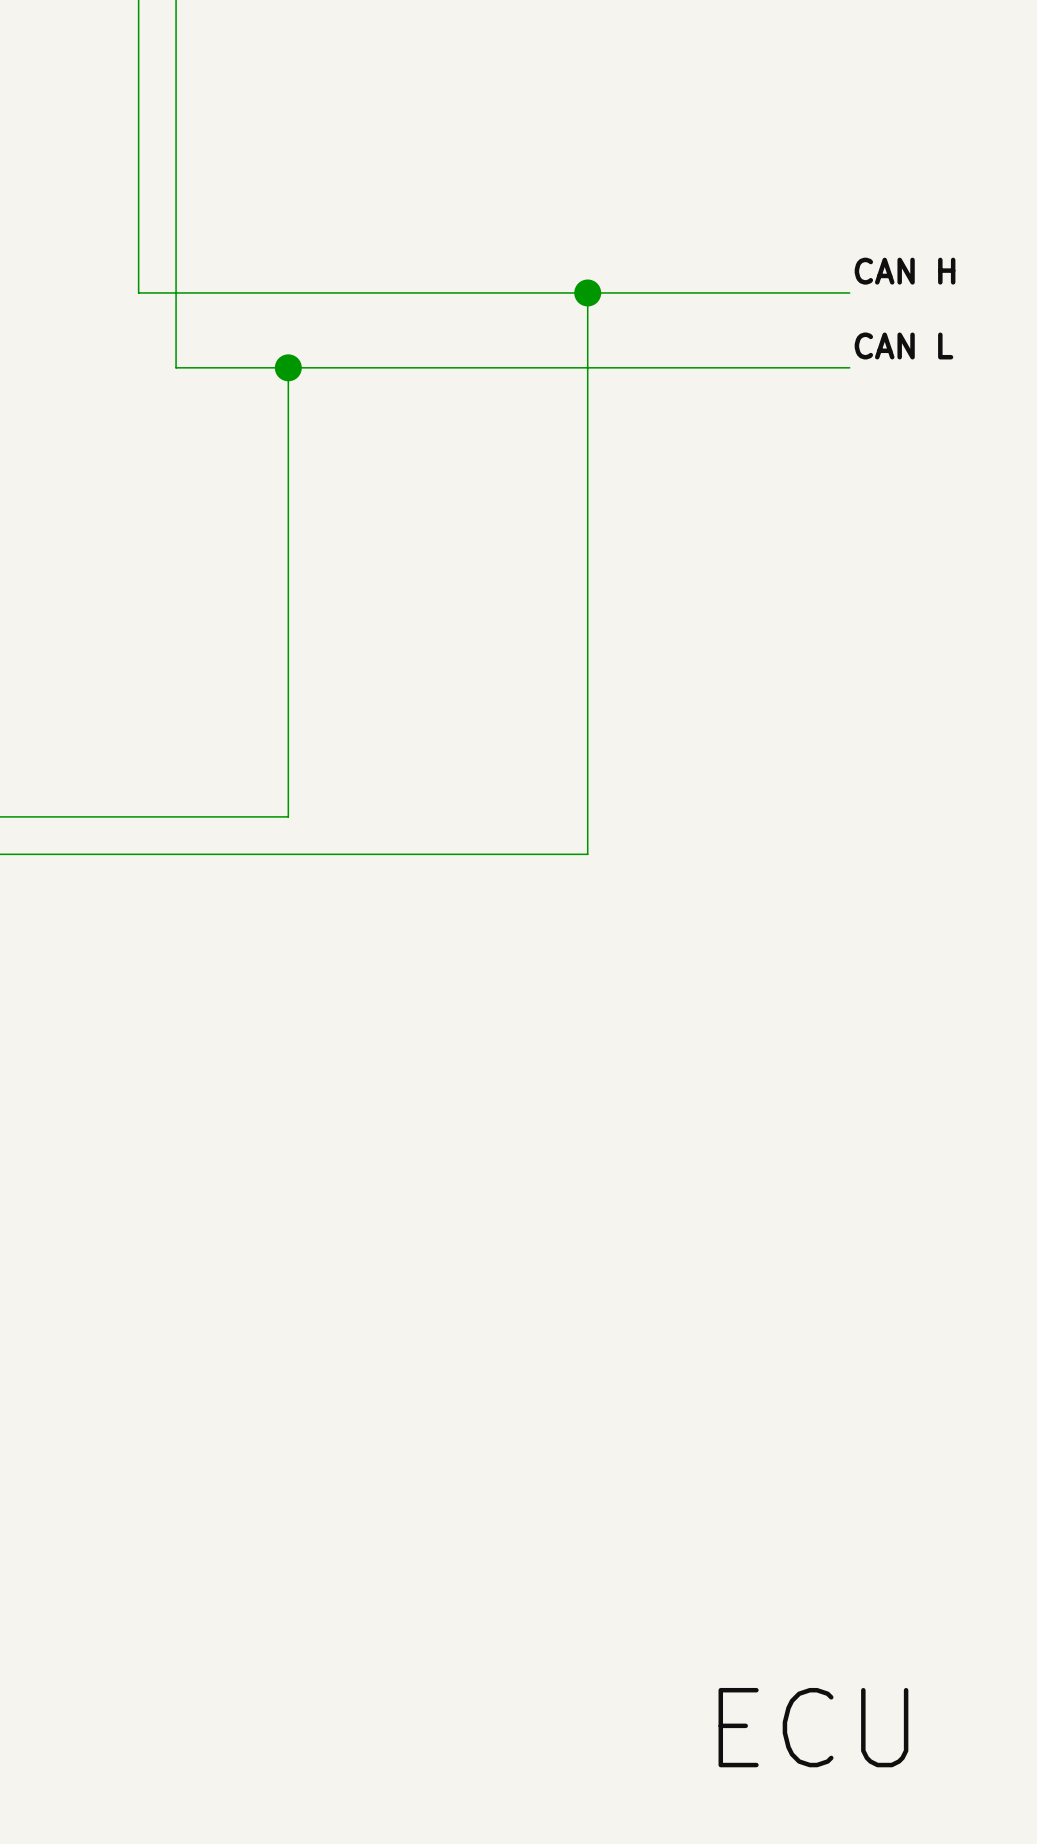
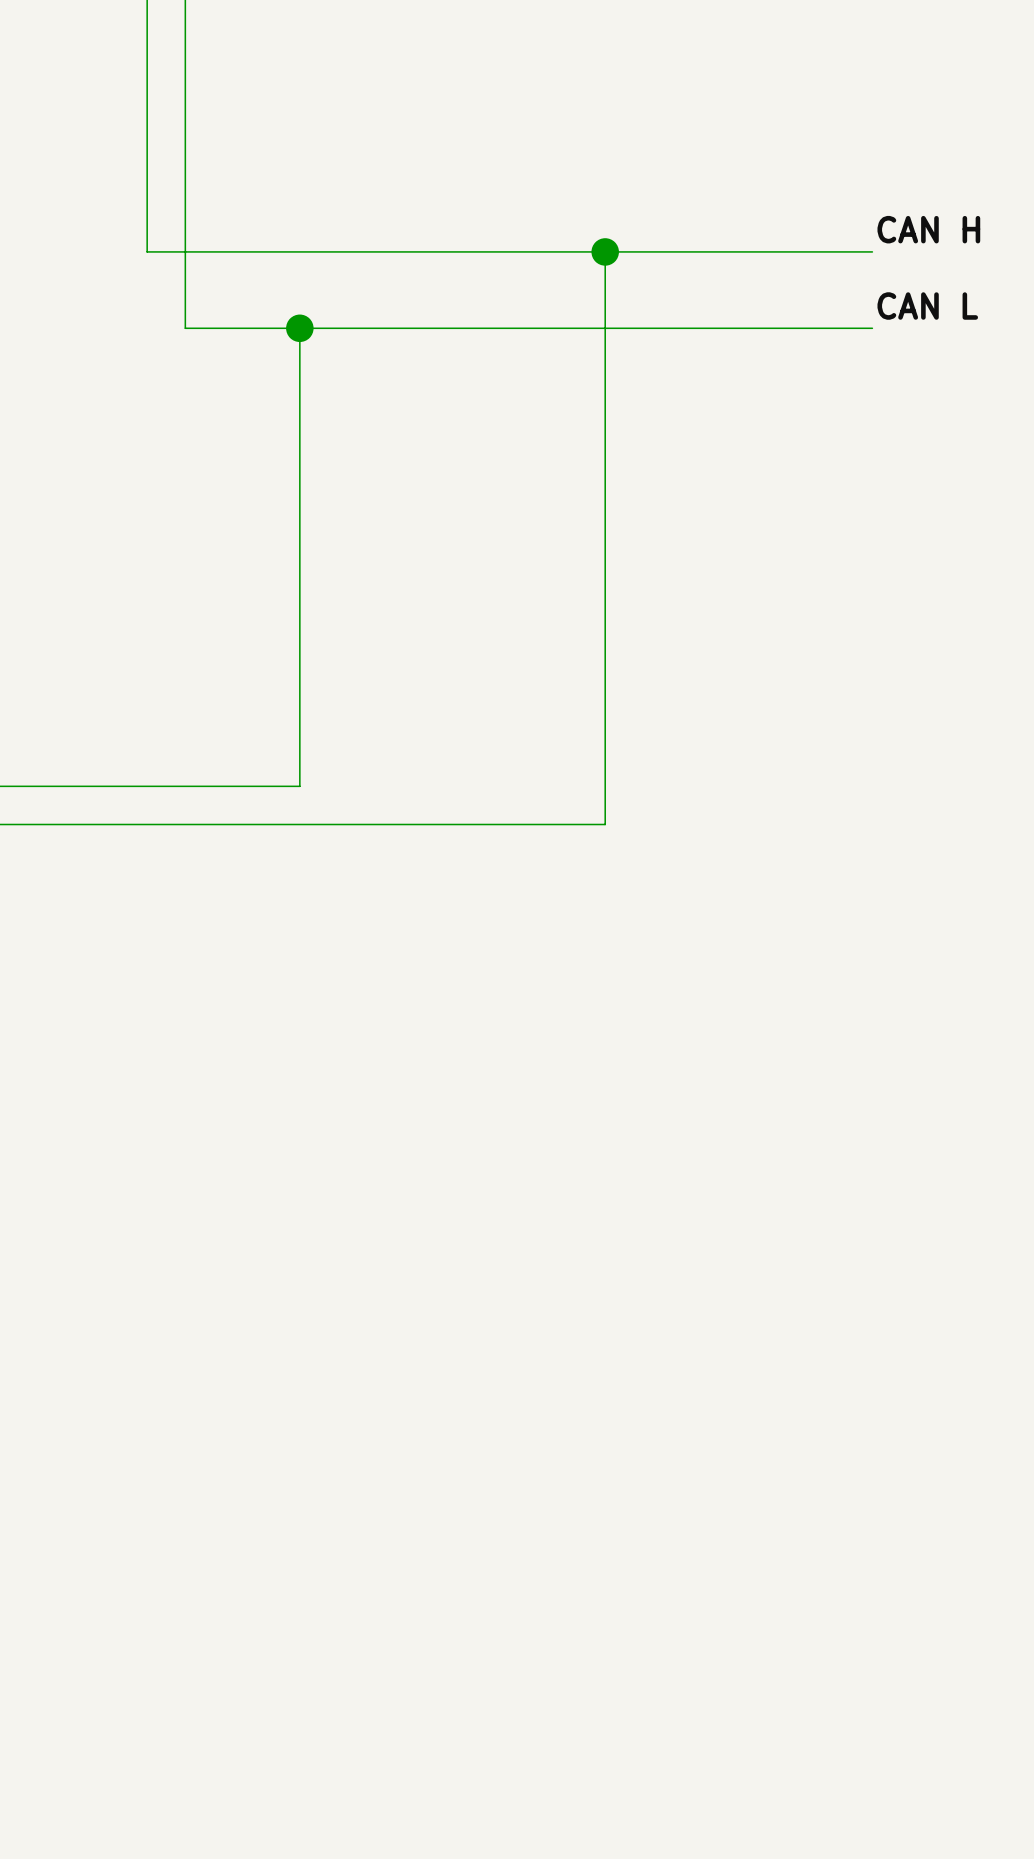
label: ECU (813, 1727) -> none

